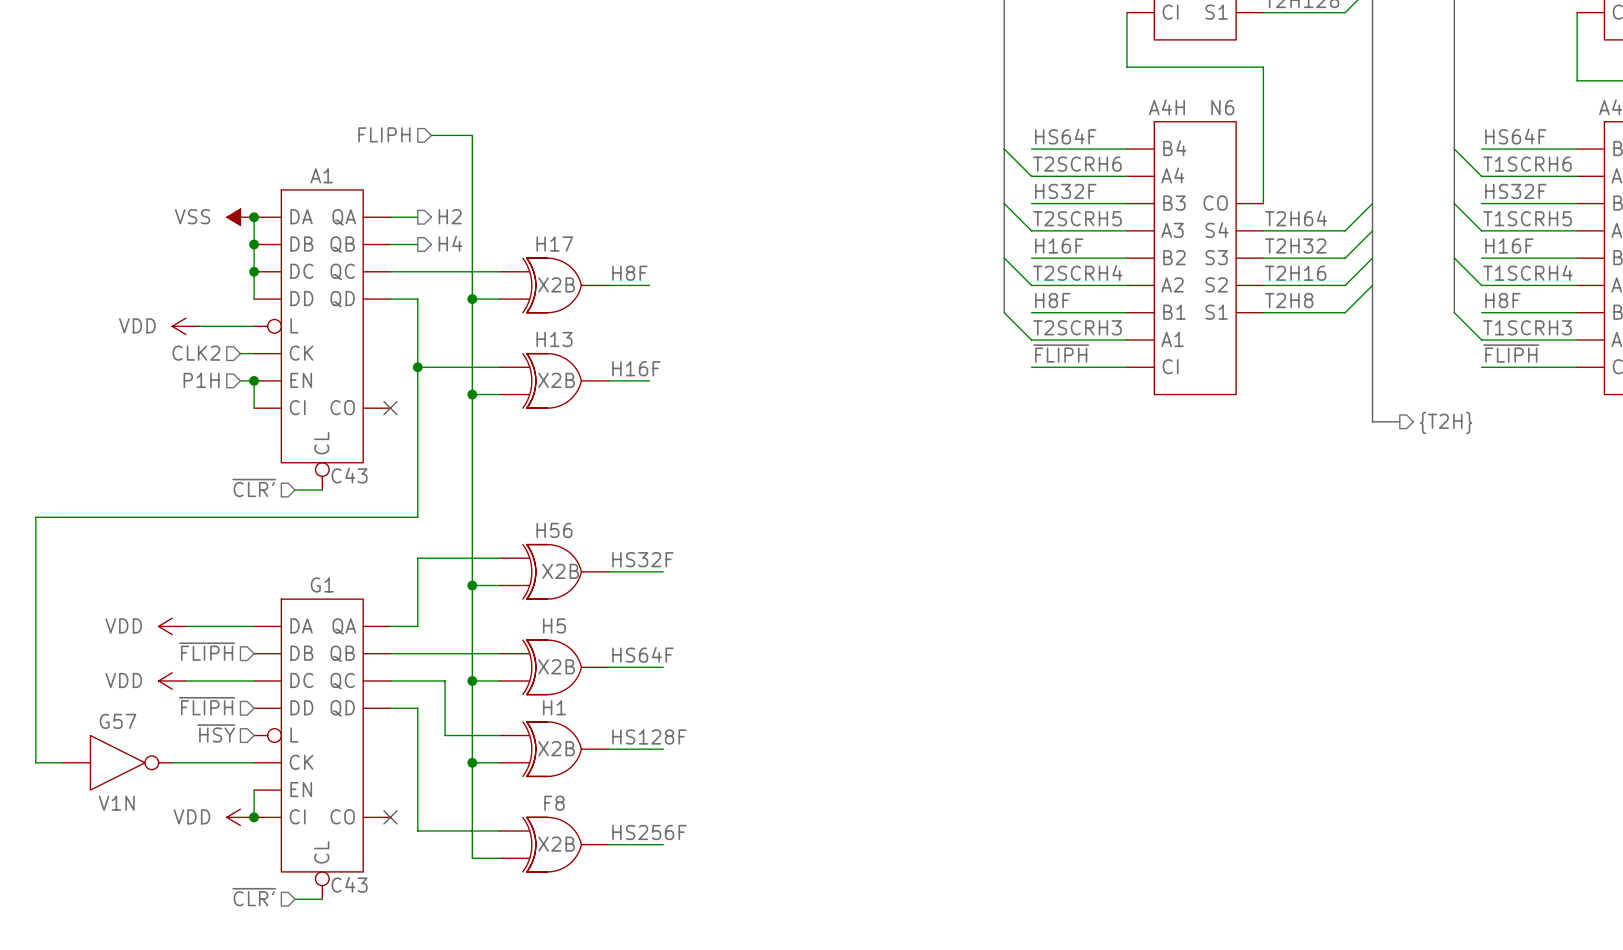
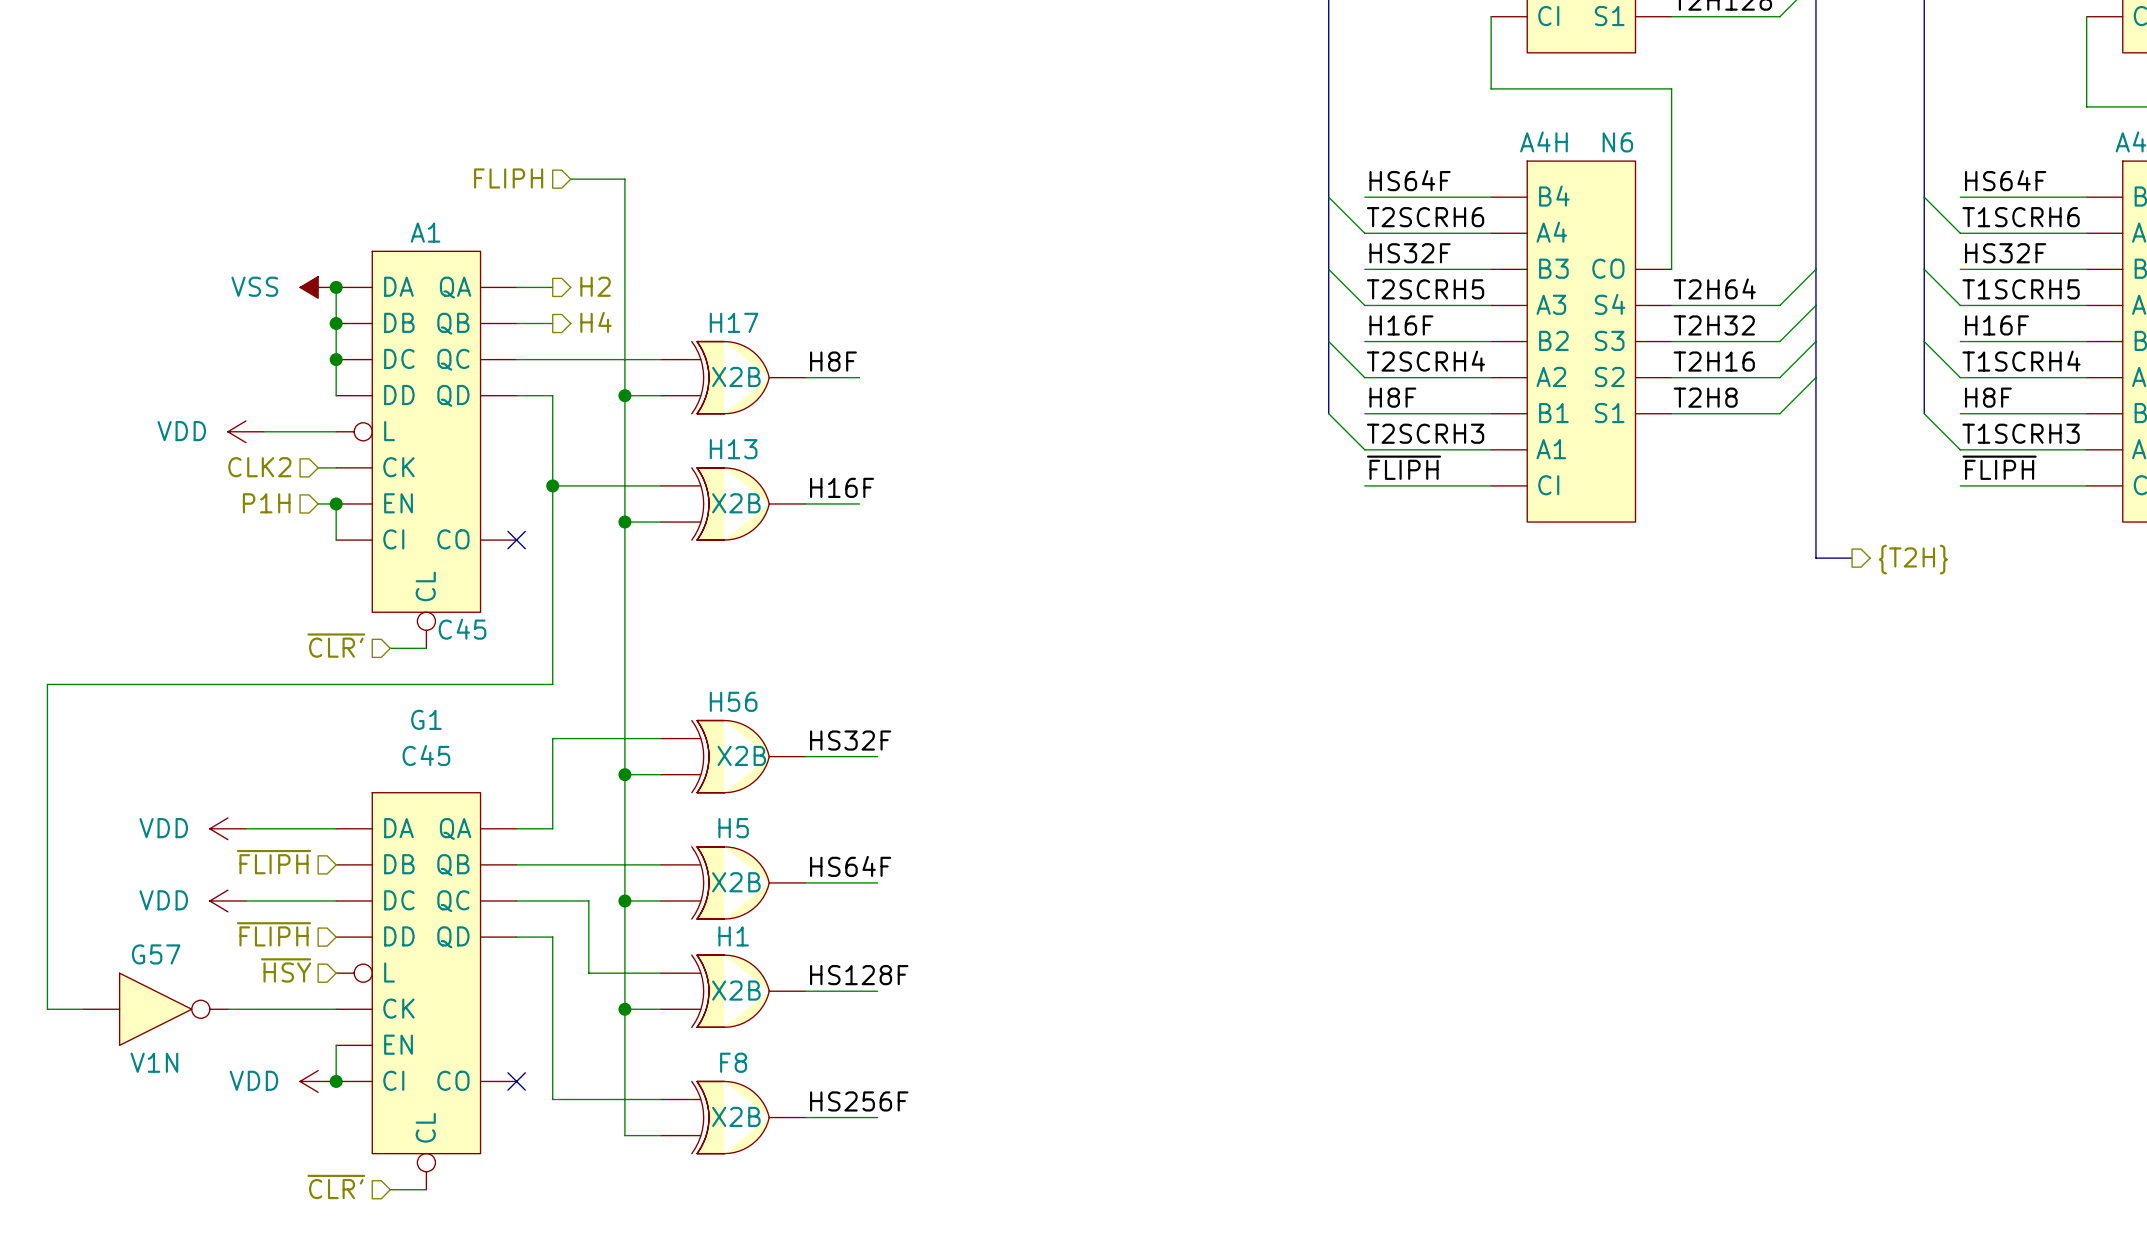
A1 value: C43 (349, 475) -> C45 (462, 629)
G1 name position: G1 (322, 584) -> G1 (426, 719)
G1 value: C43 (349, 884) -> C45 (426, 755)

